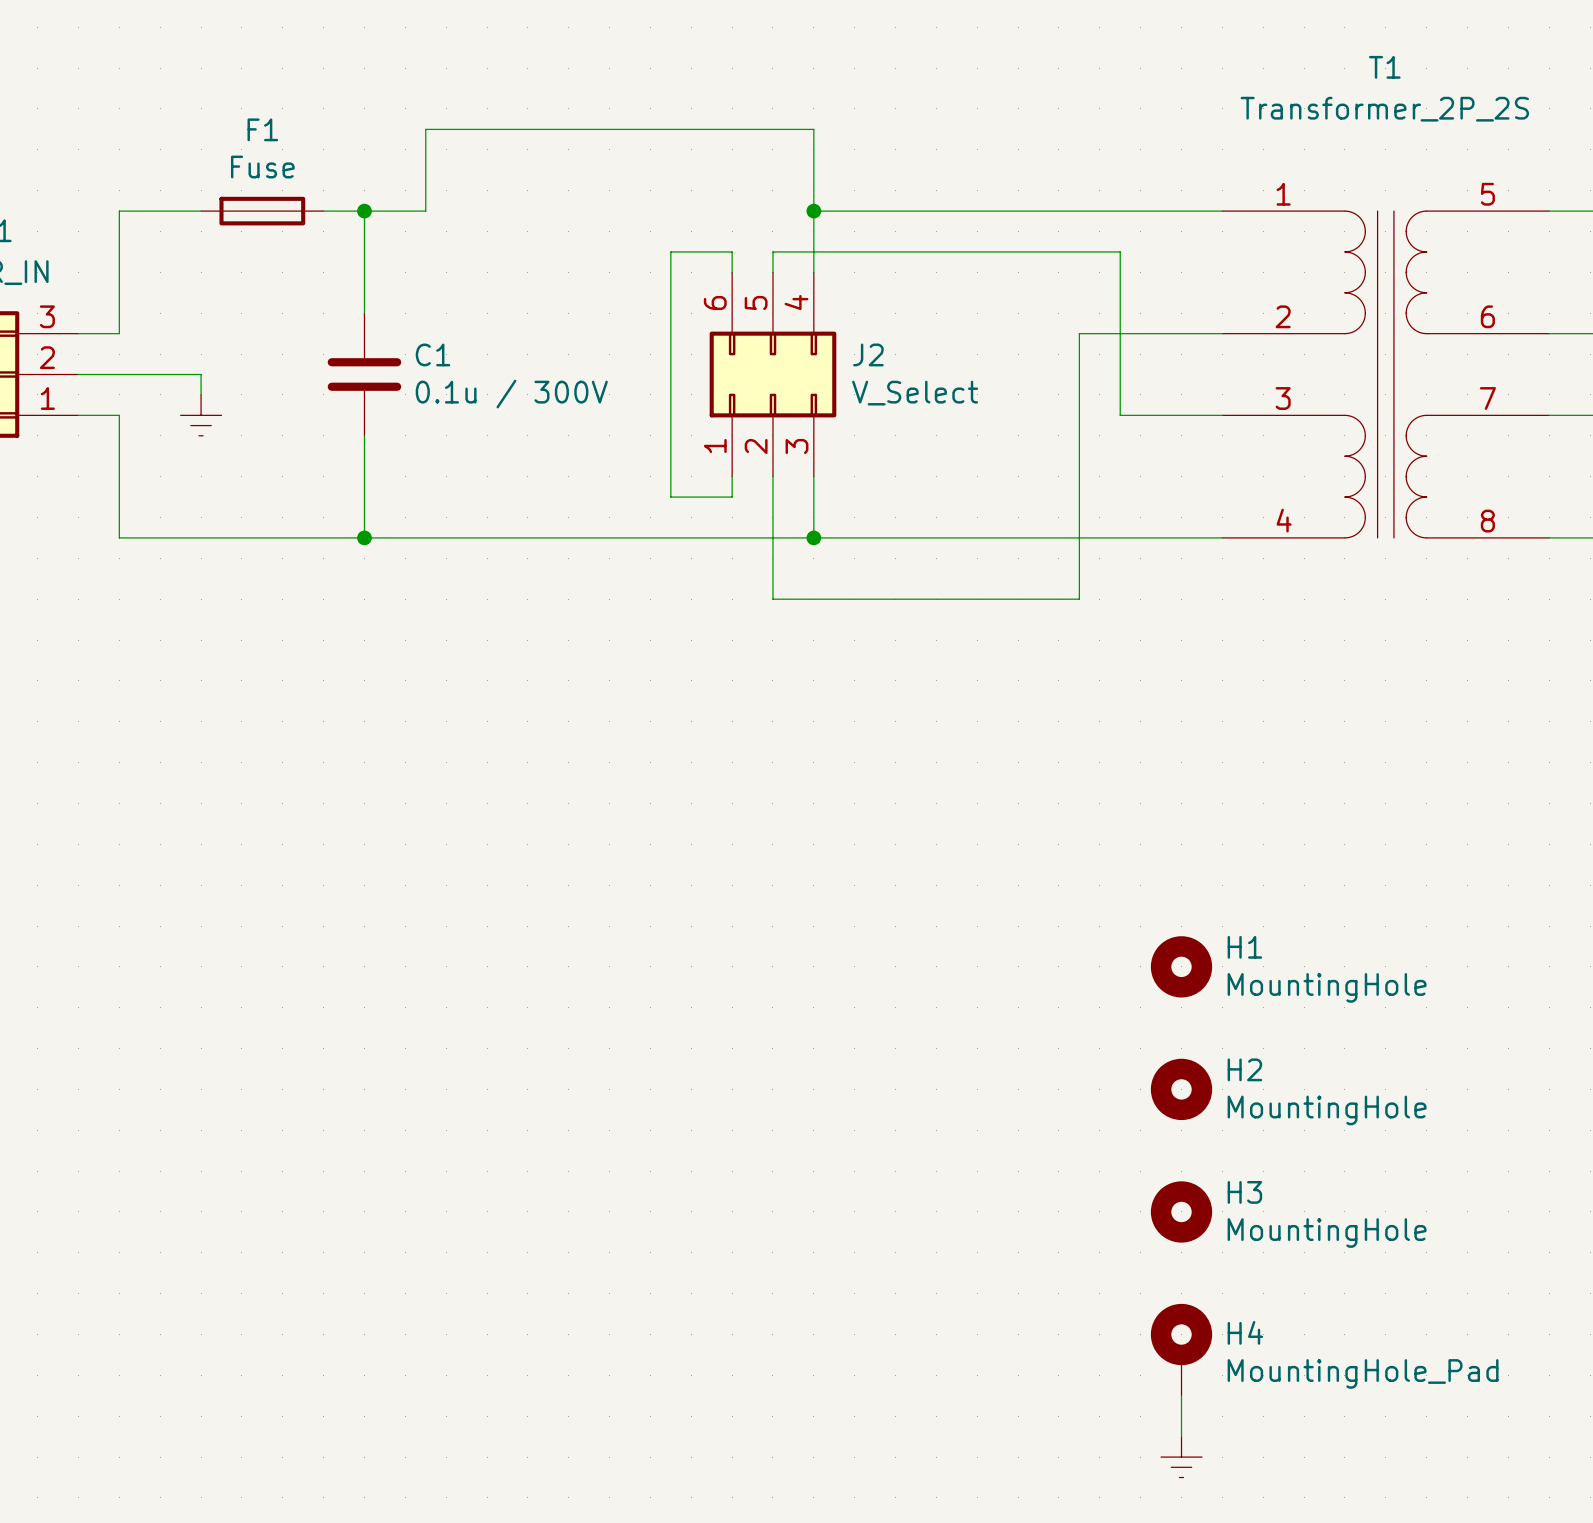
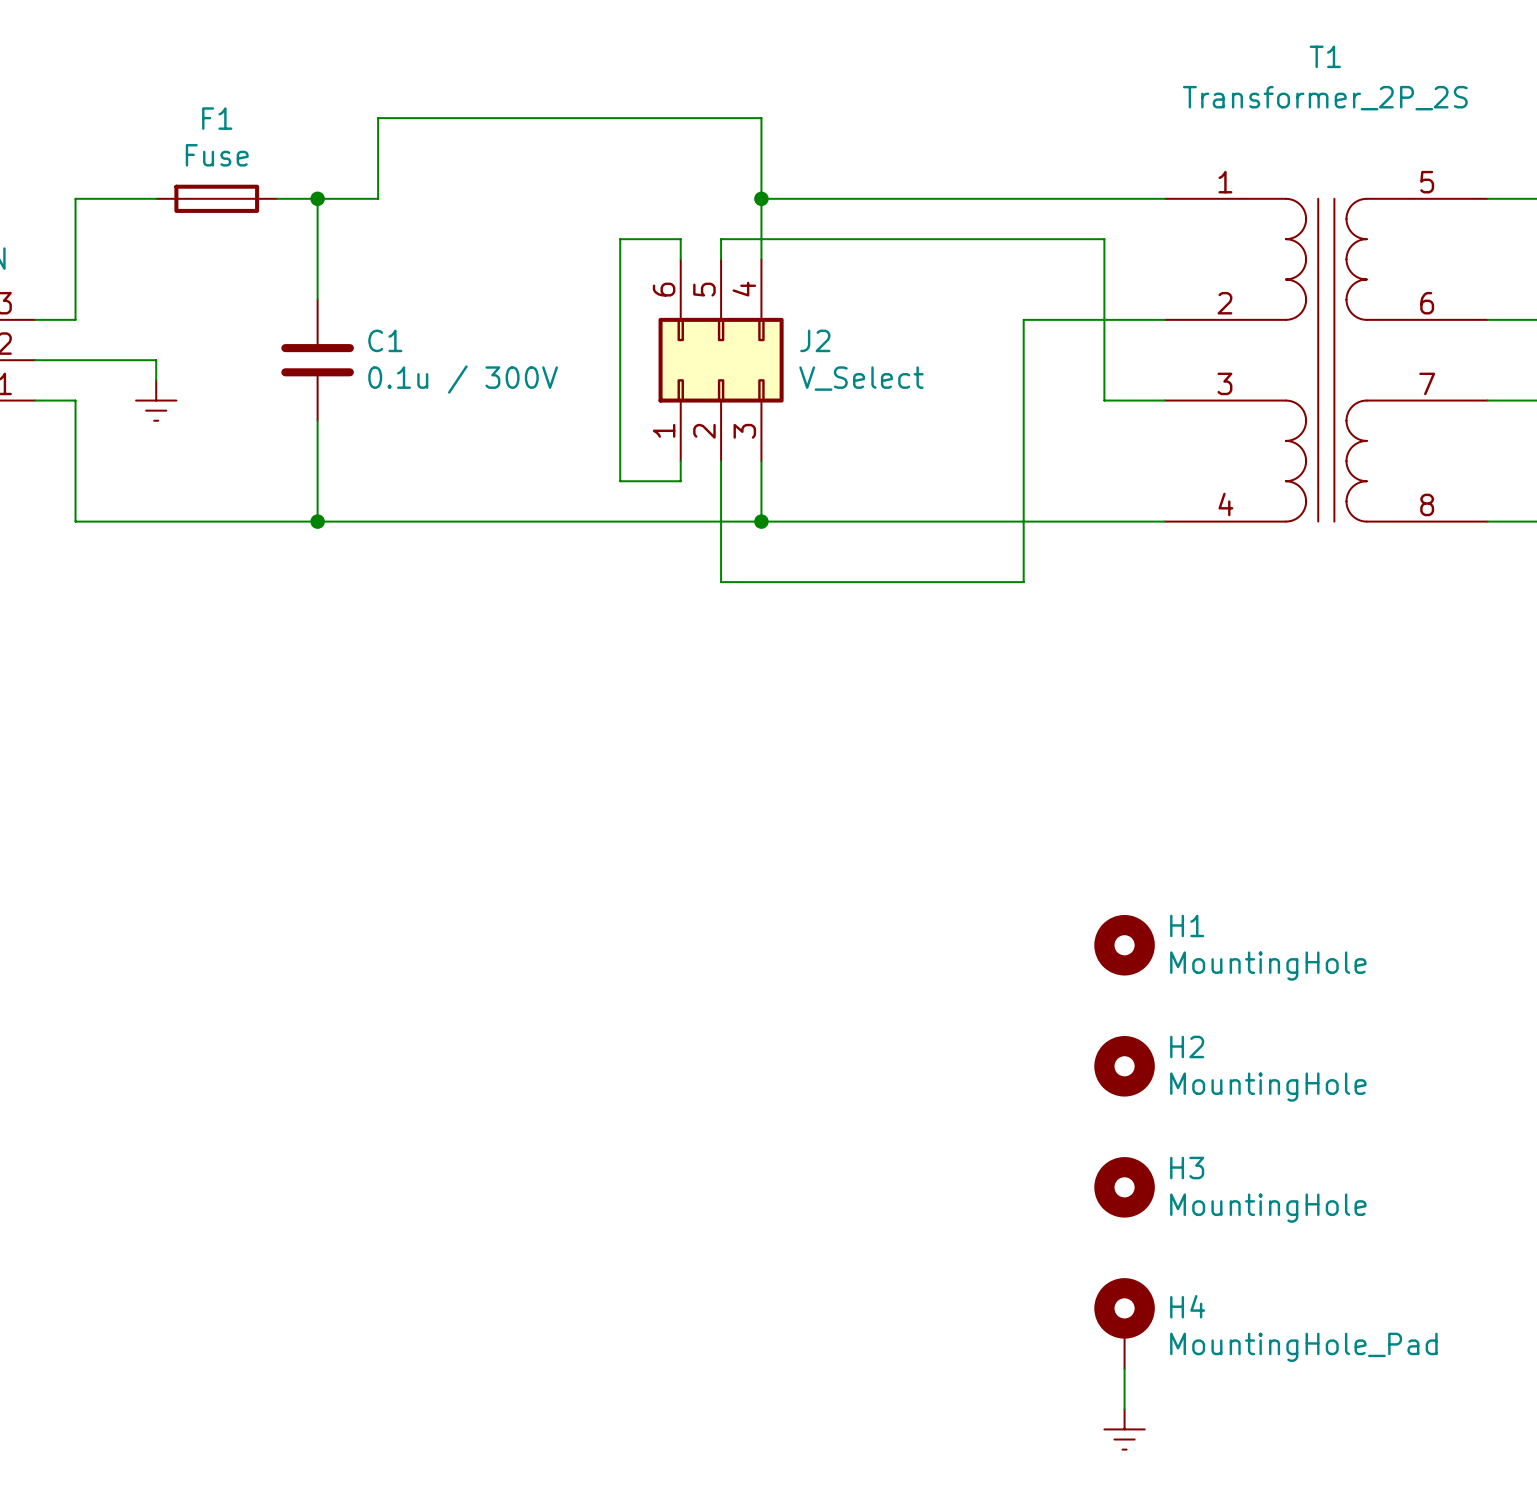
wire: (1120, 251) (1120, 415) (1161, 415) -> (1064, 239) (1104, 239) (1104, 400)

